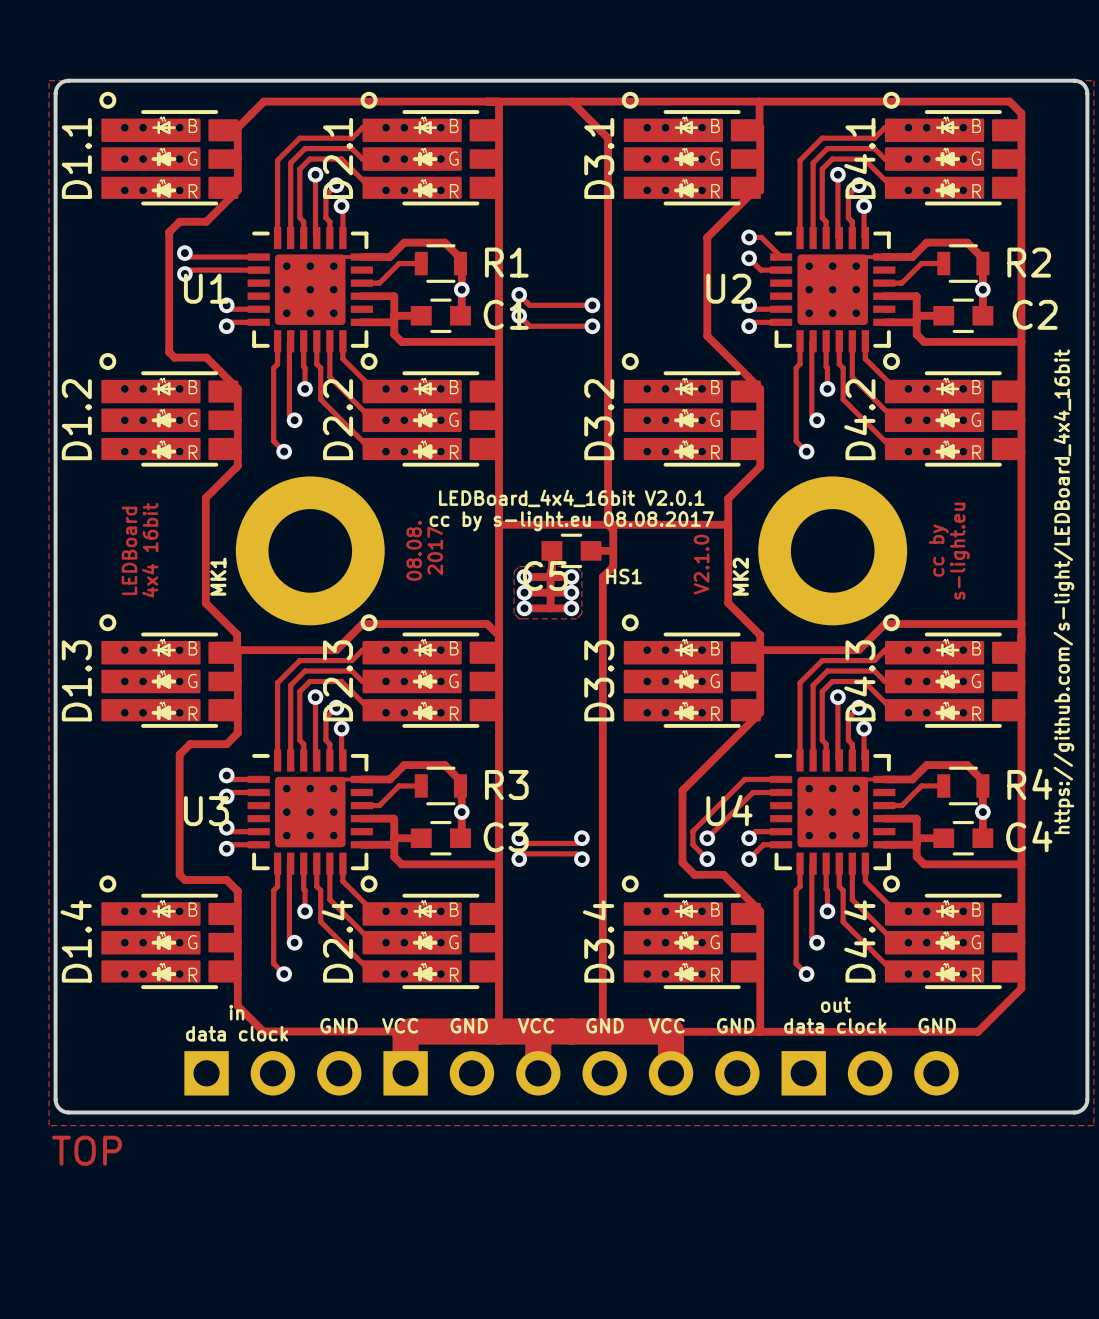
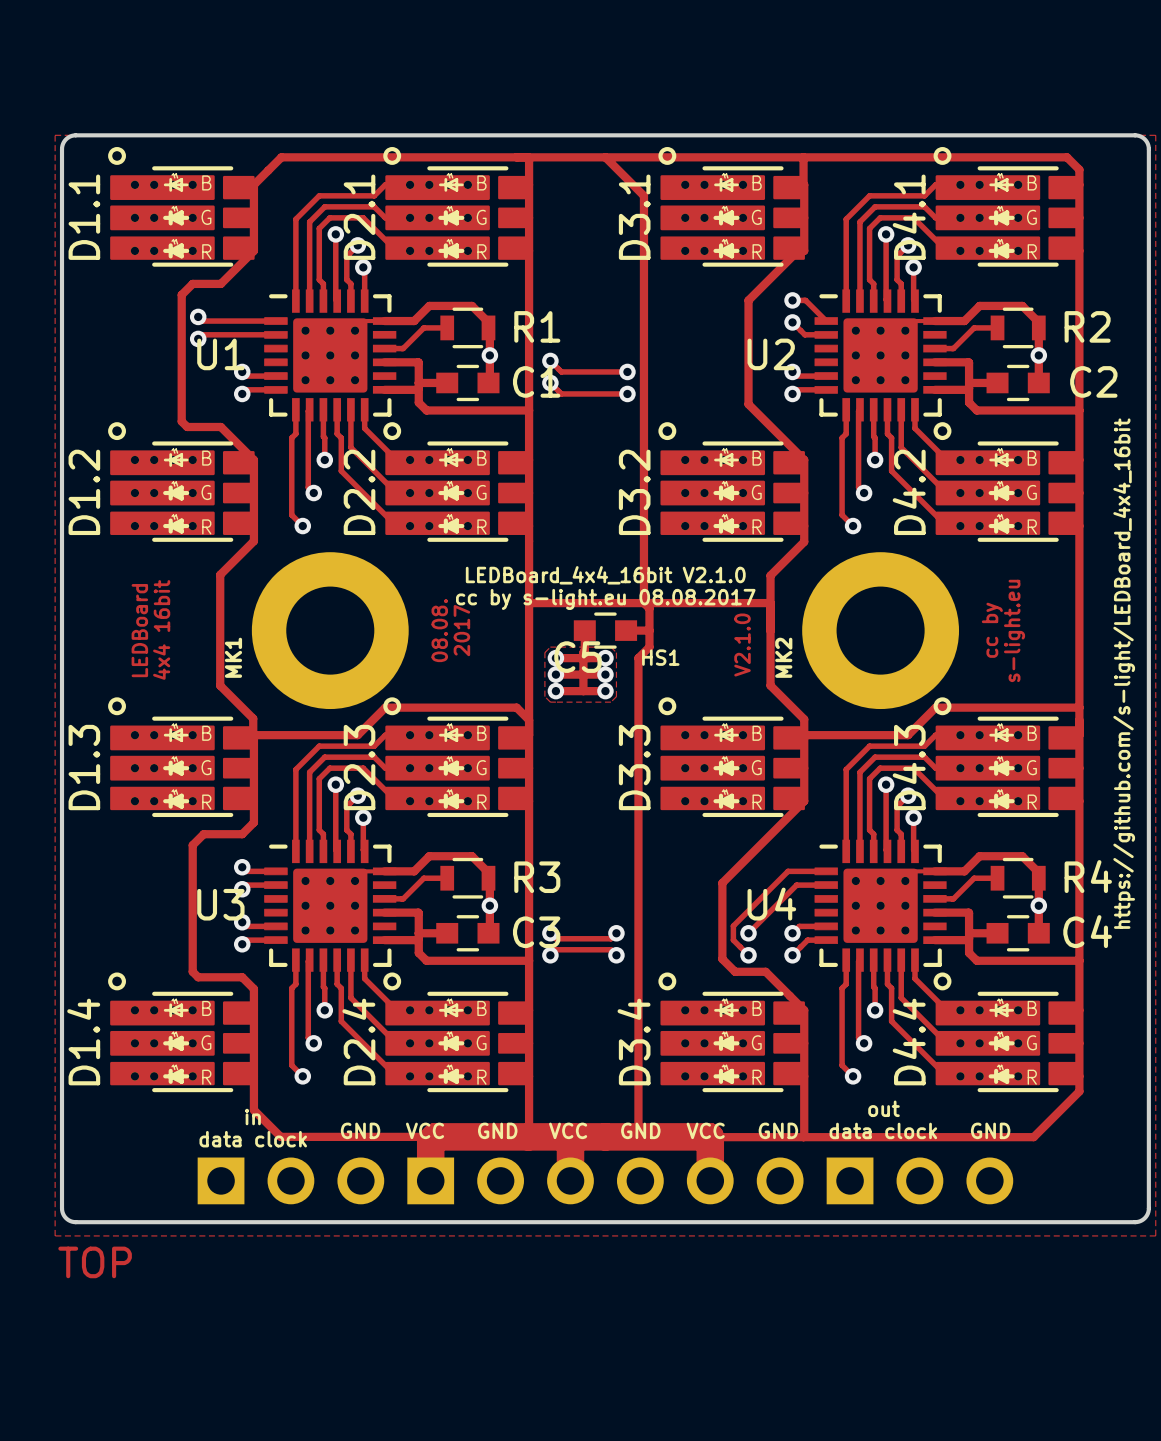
text: LEDBoard_4x4_16bit V2.0.1 (571, 498) -> LEDBoard_4x4_16bit V2.1.0 (605, 575)

